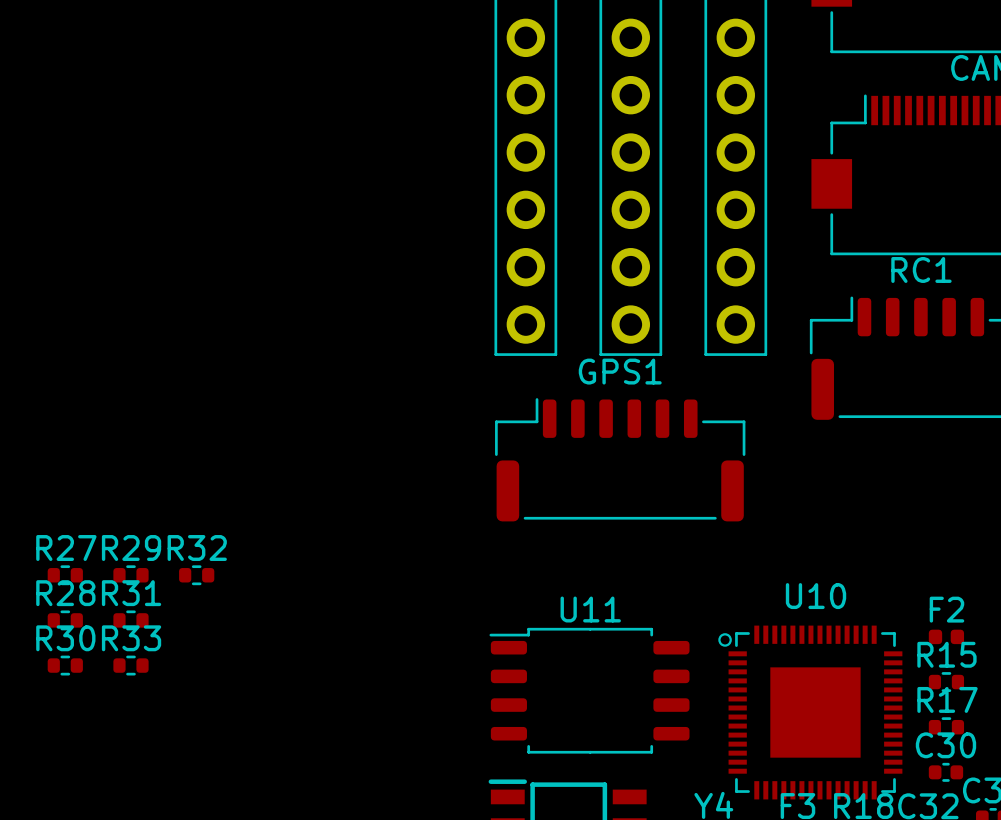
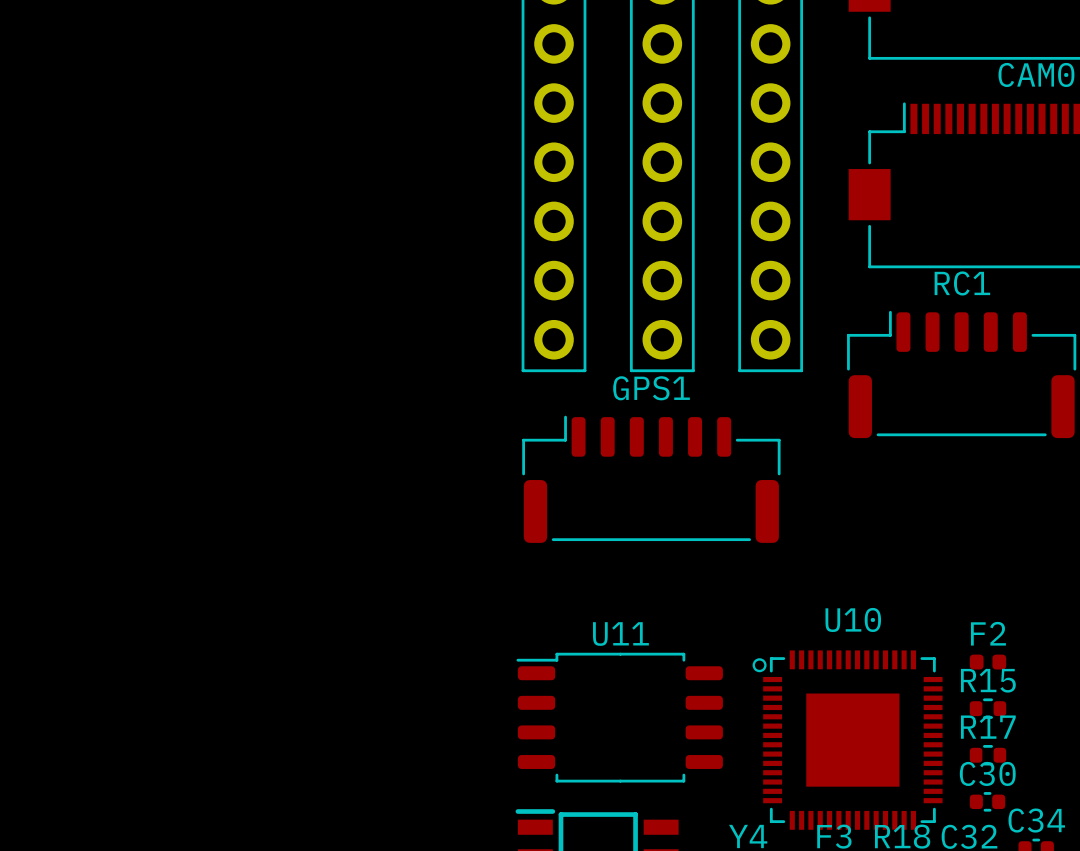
R27: (65, 575) -> none
R29: (130, 575) -> none
R32: (196, 575) -> none
R28: (65, 620) -> none
R31: (130, 620) -> none
R30: (65, 665) -> none
R33: (130, 665) -> none

